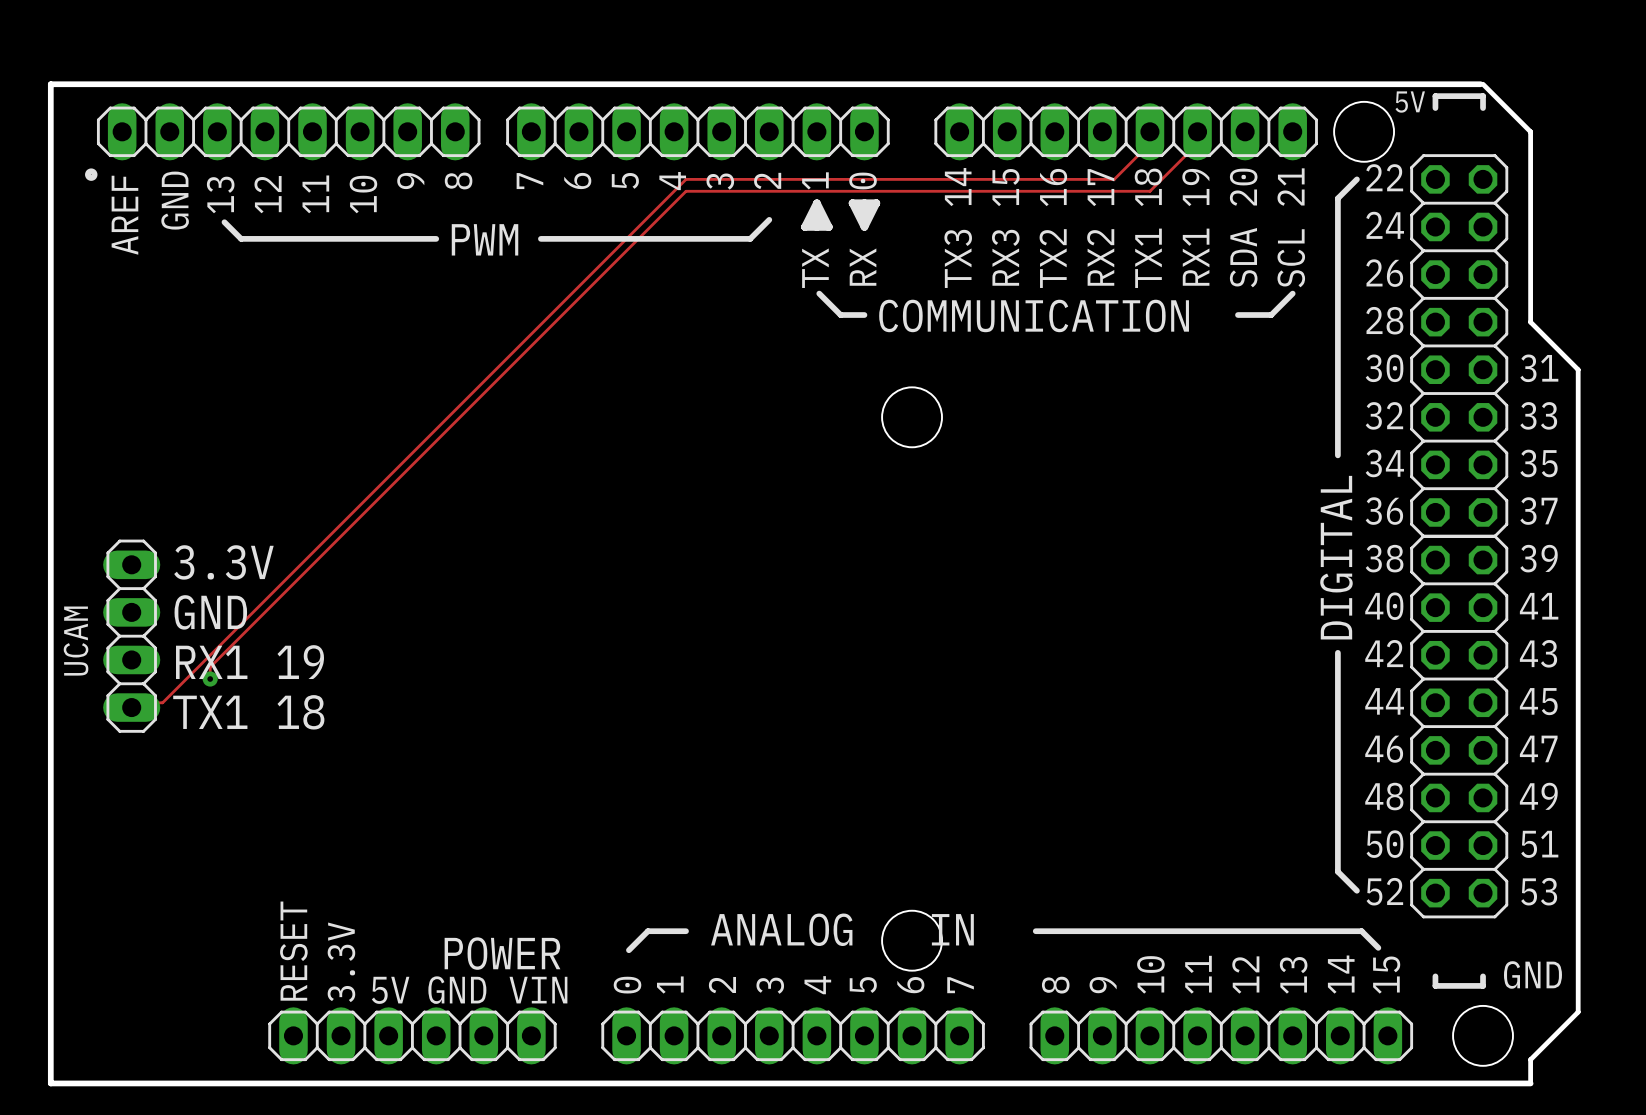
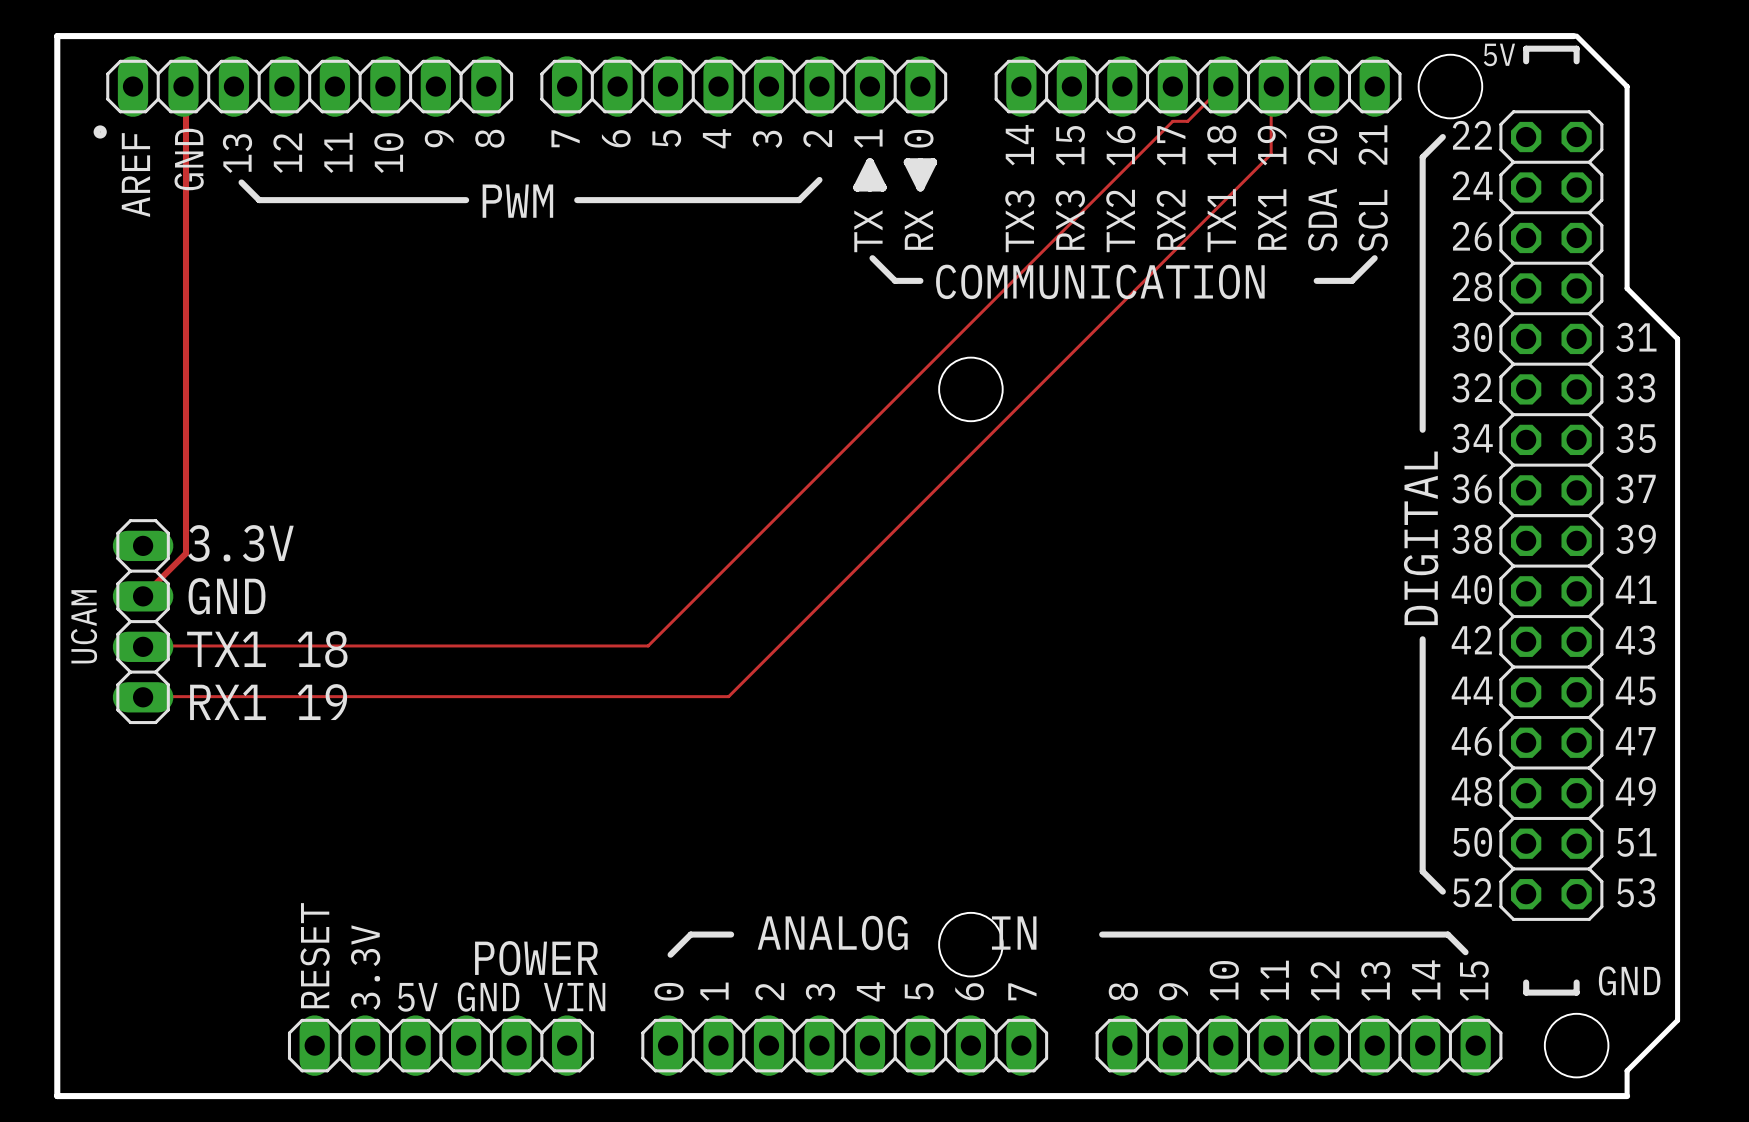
track: none -> (183, 86) (186, 88) (186, 553) (143, 596)
track: (1149, 131) (1149, 143) (1114, 179) (686, 179) (162, 702) (138, 702) (131, 707) -> (1223, 86) (1187, 121) (1172, 121) (648, 645) (143, 646)
track: (1197, 131) (1197, 143) (1149, 191) (686, 191) (210, 667) (210, 679) -> (1273, 86) (1271, 88) (1271, 154) (728, 696) (143, 697)
text: RX1 19 (250, 662) -> TX1 18 (267, 649)
via: (210, 679) -> none
text: TX1 18 (248, 712) -> RX1 19 (268, 702)

